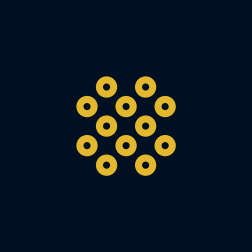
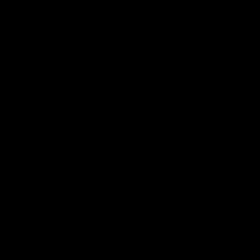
part: (126, 126) -> none

